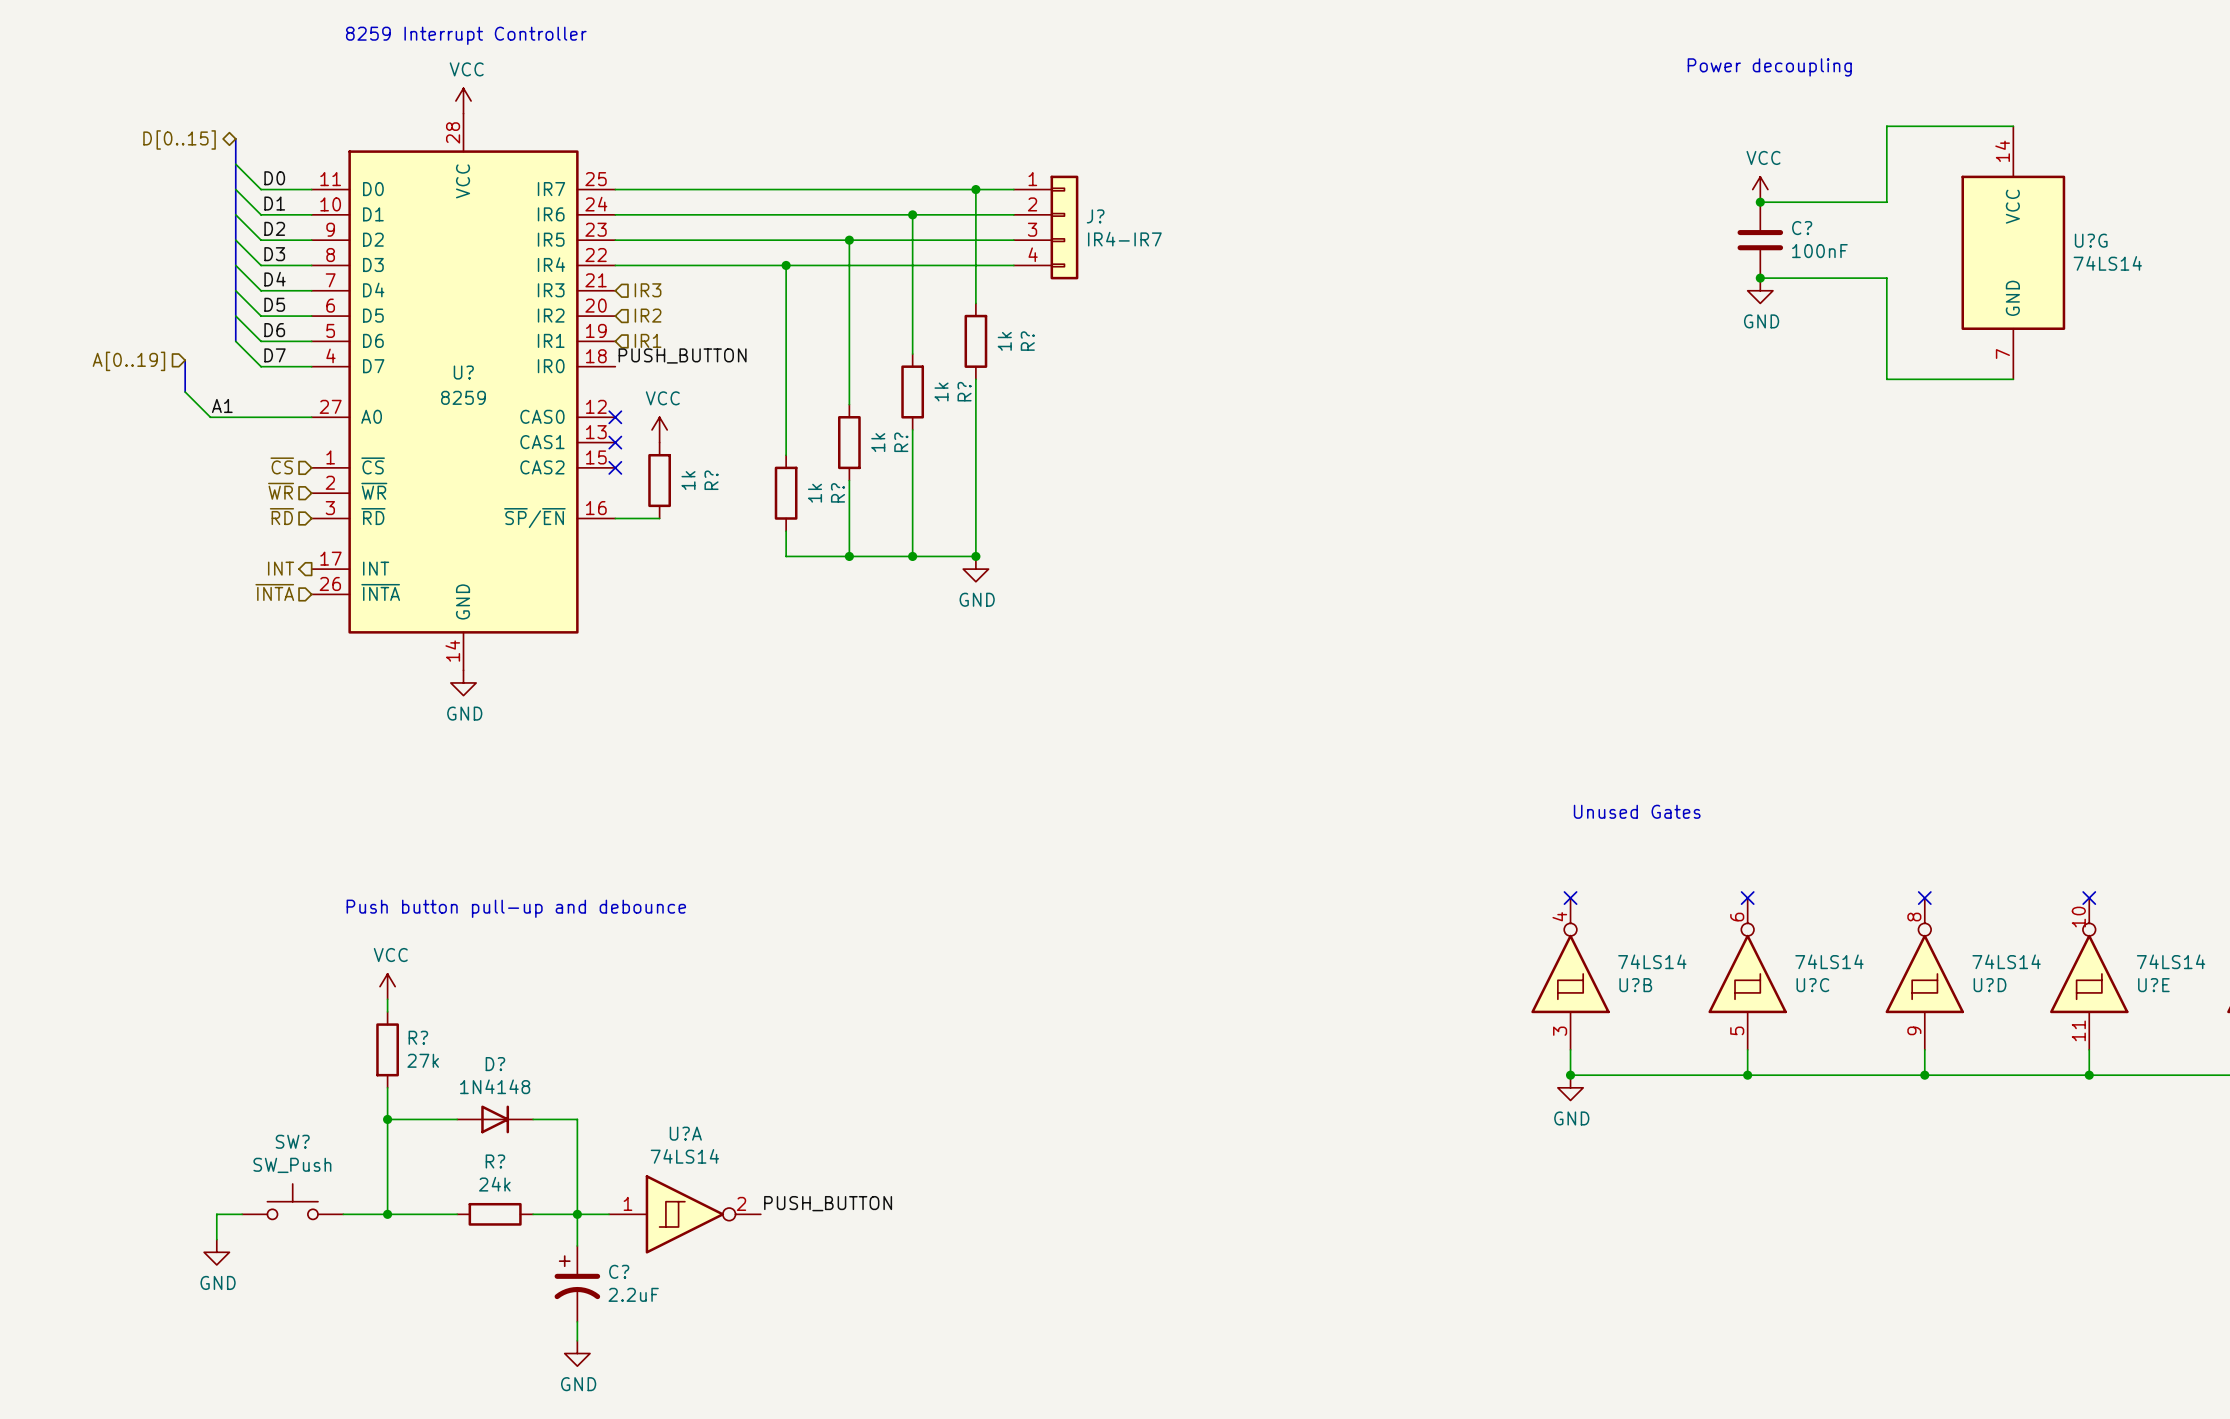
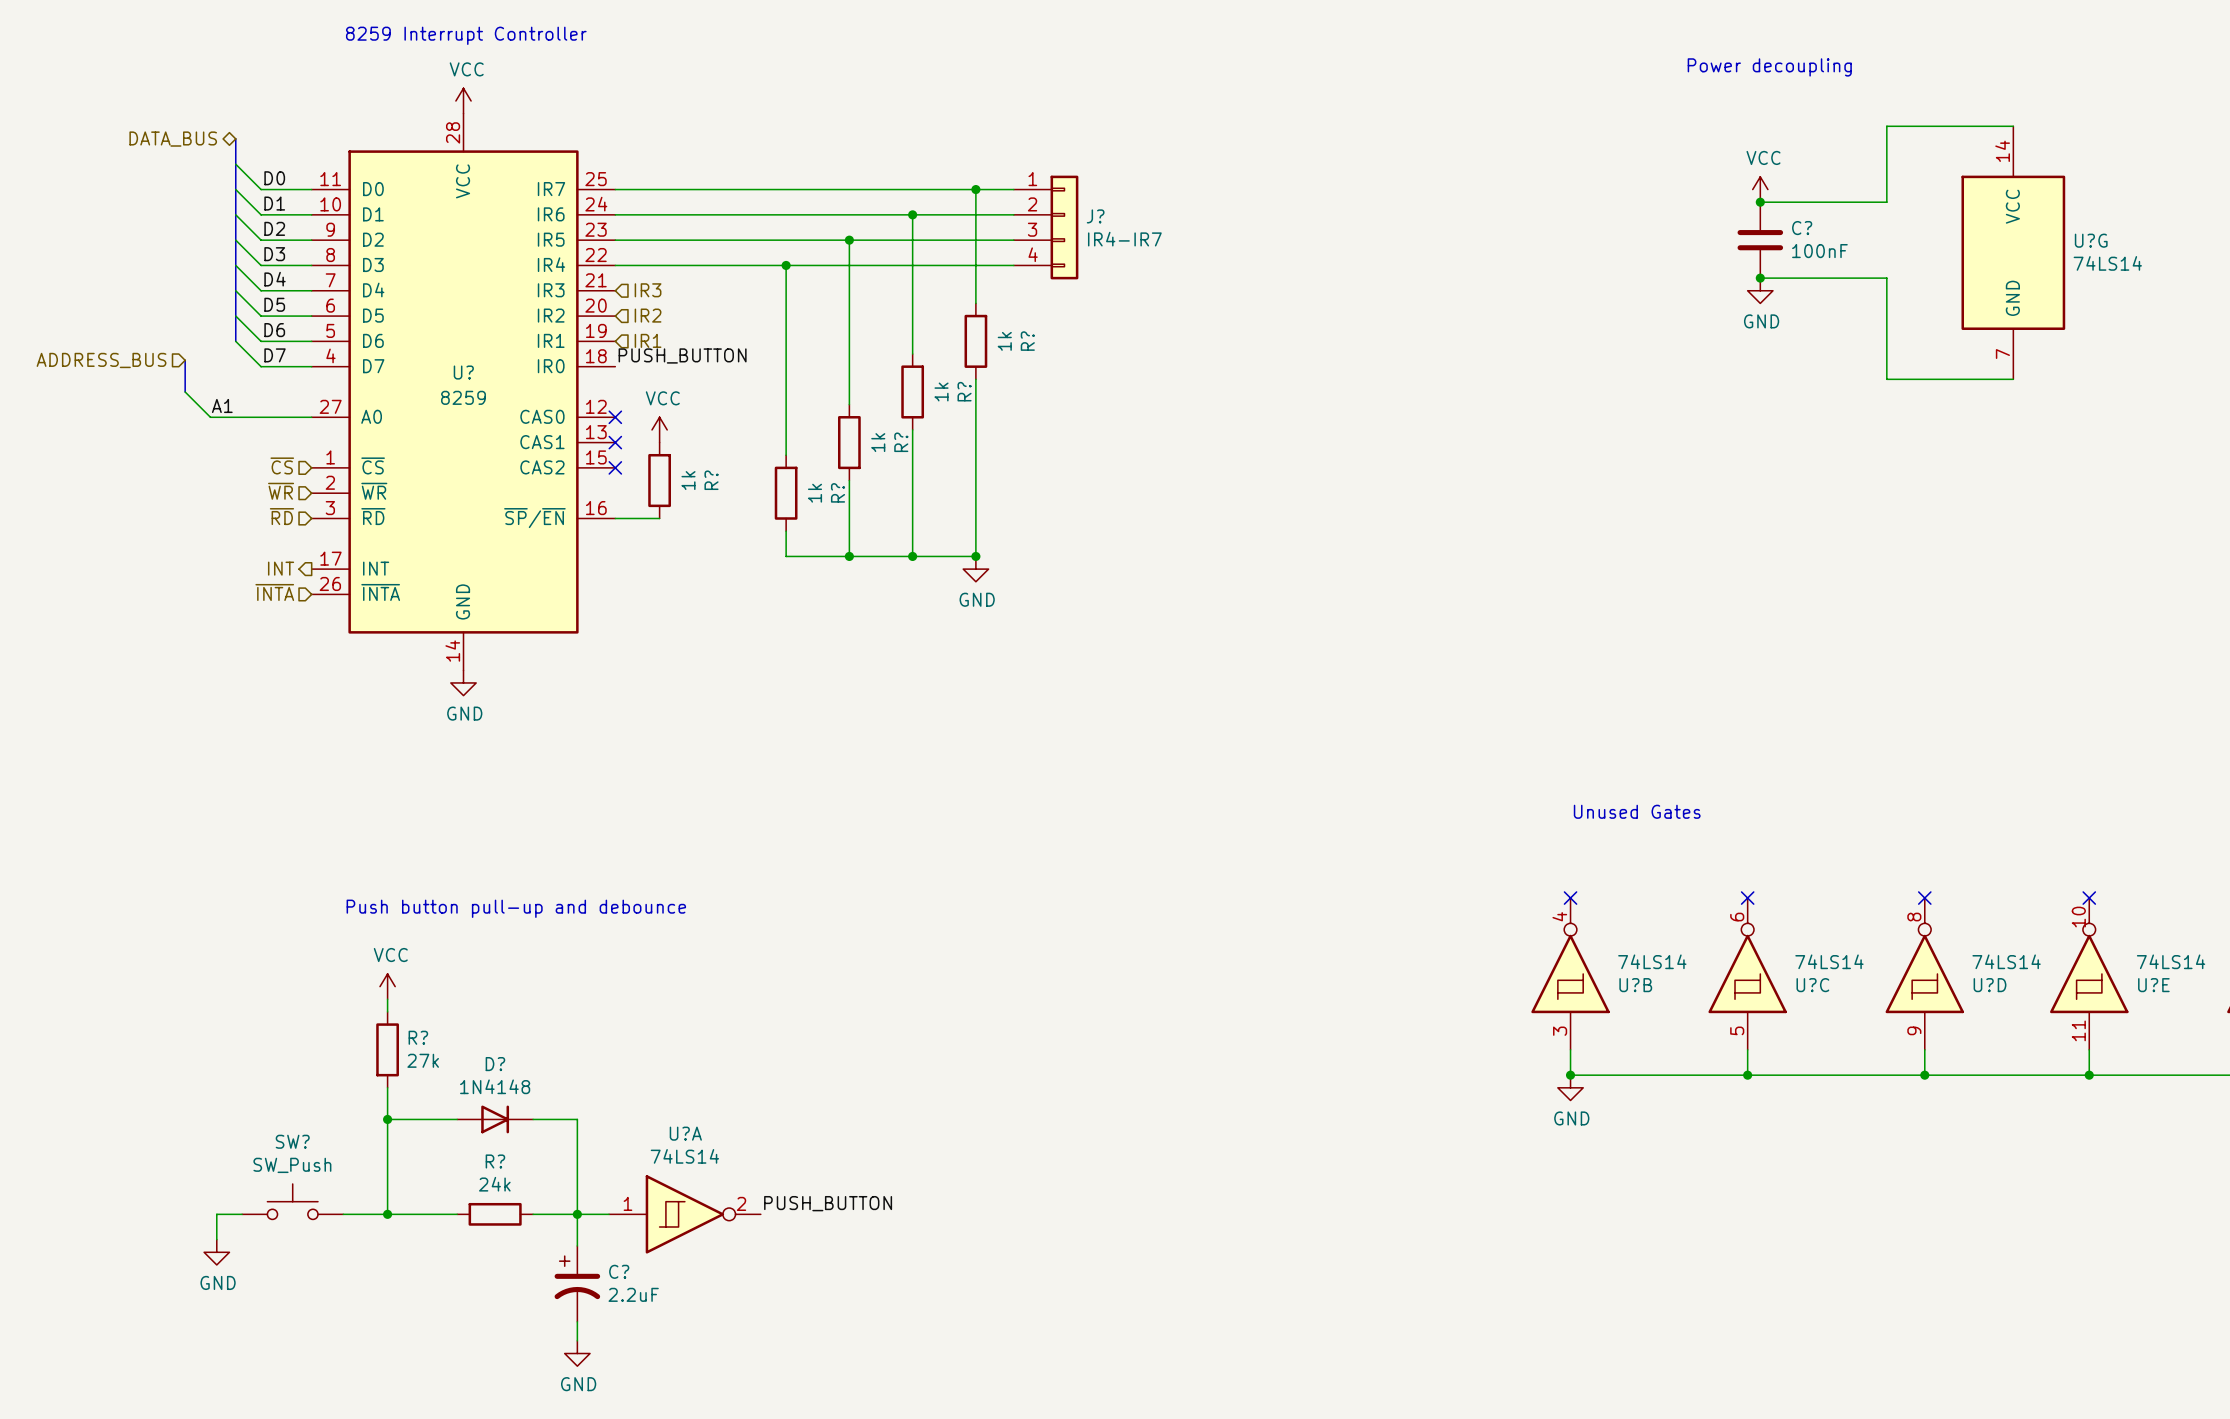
hierarchical label: D[0..15] (179, 139) -> DATA_BUS (173, 139)
hierarchical label: A[0..19] (128, 361) -> ADDRESS_BUS (101, 360)

